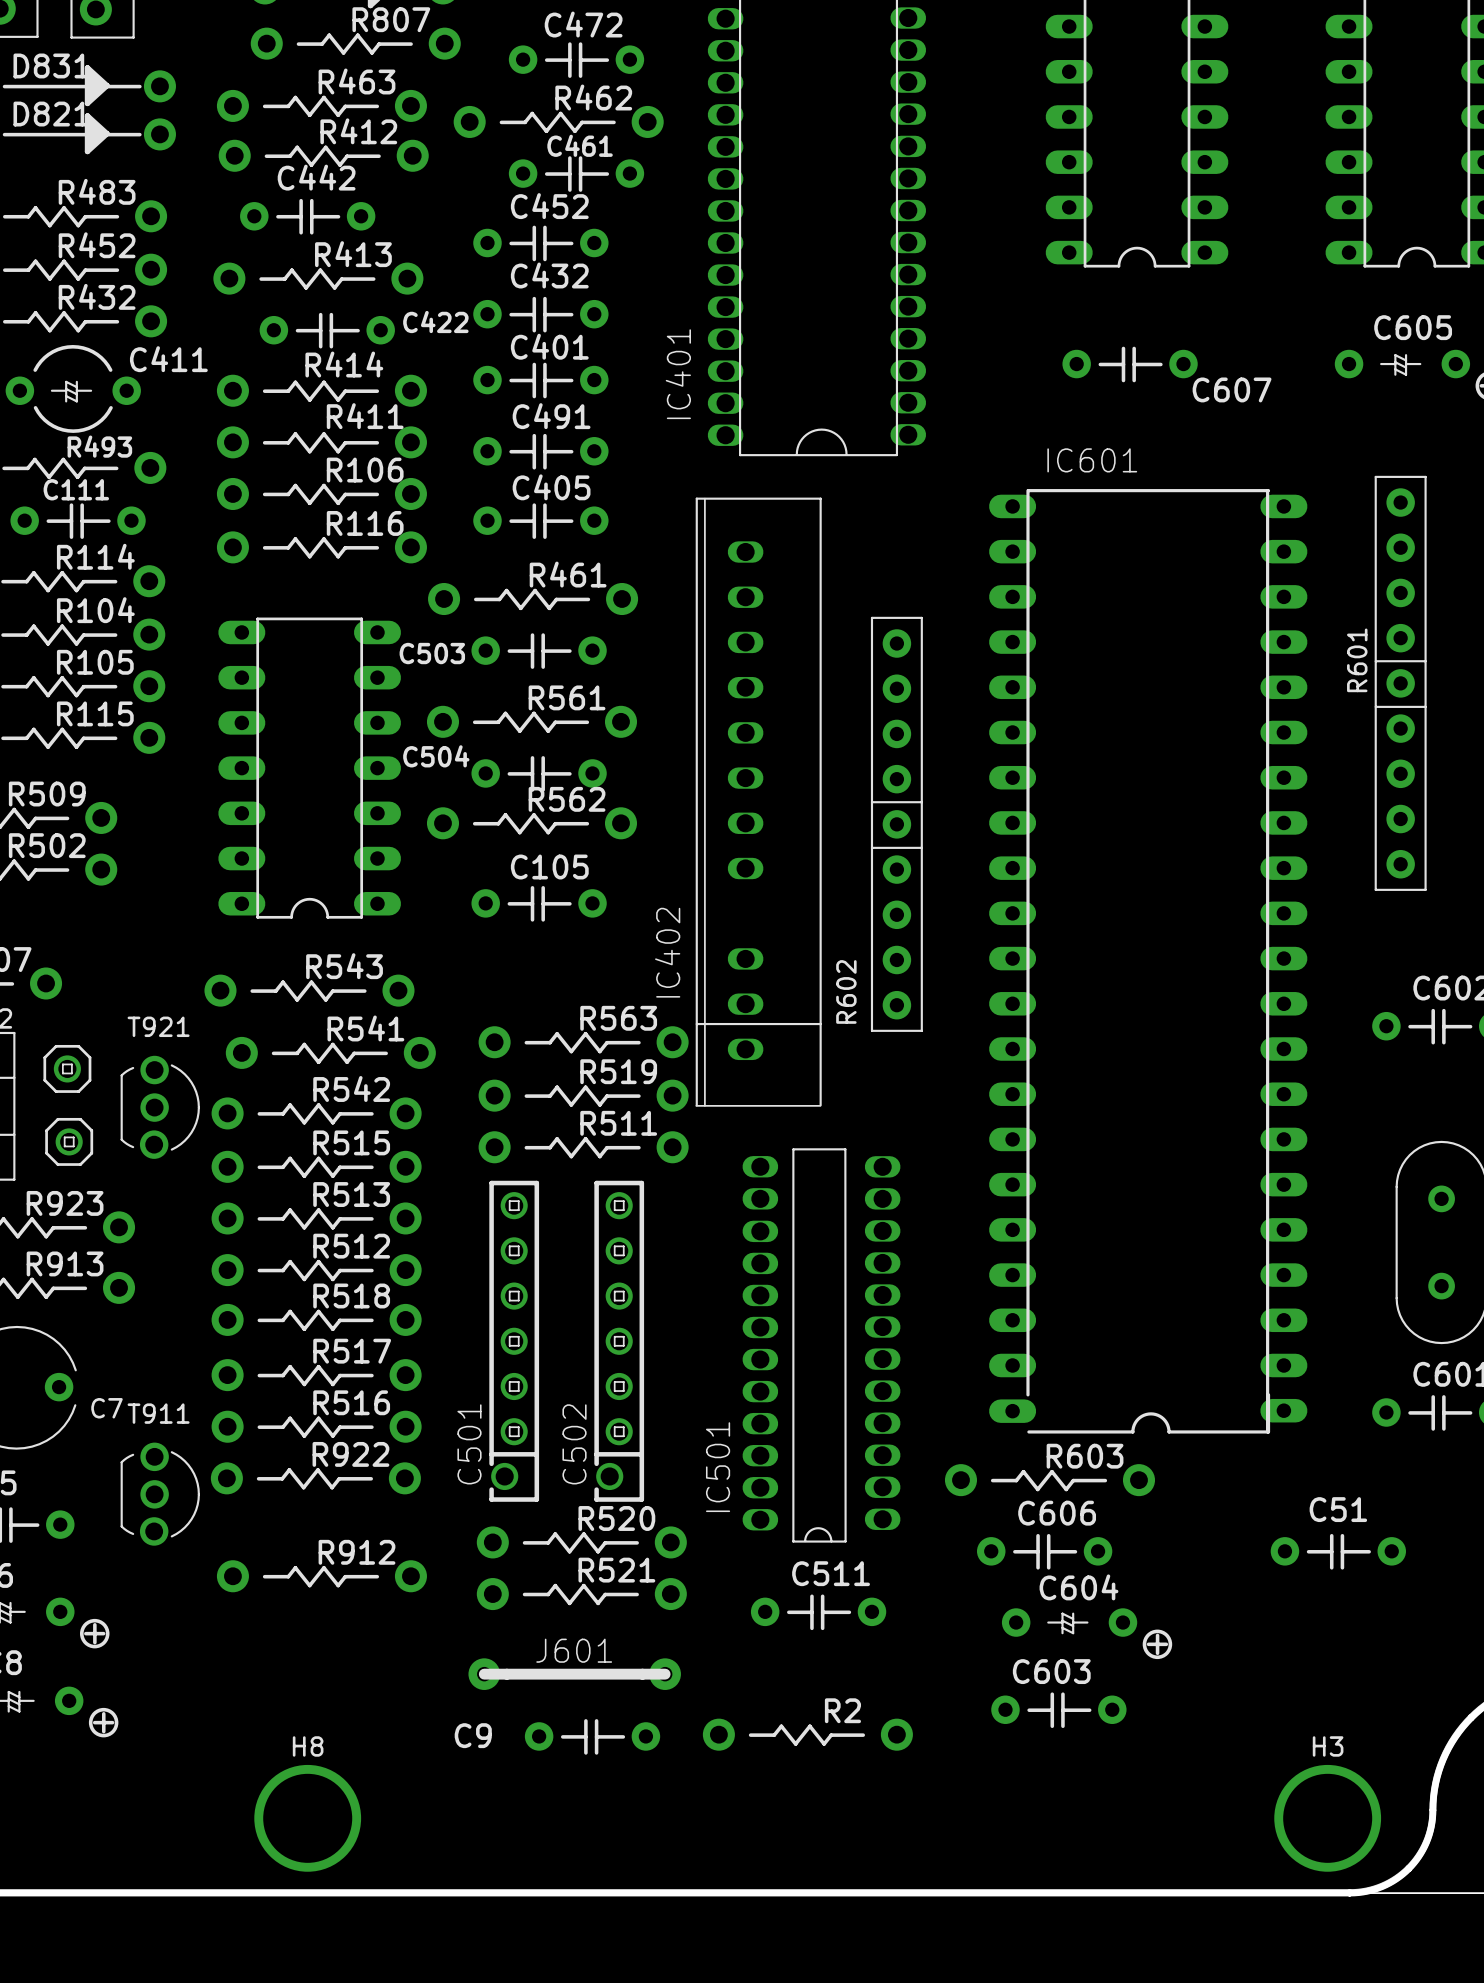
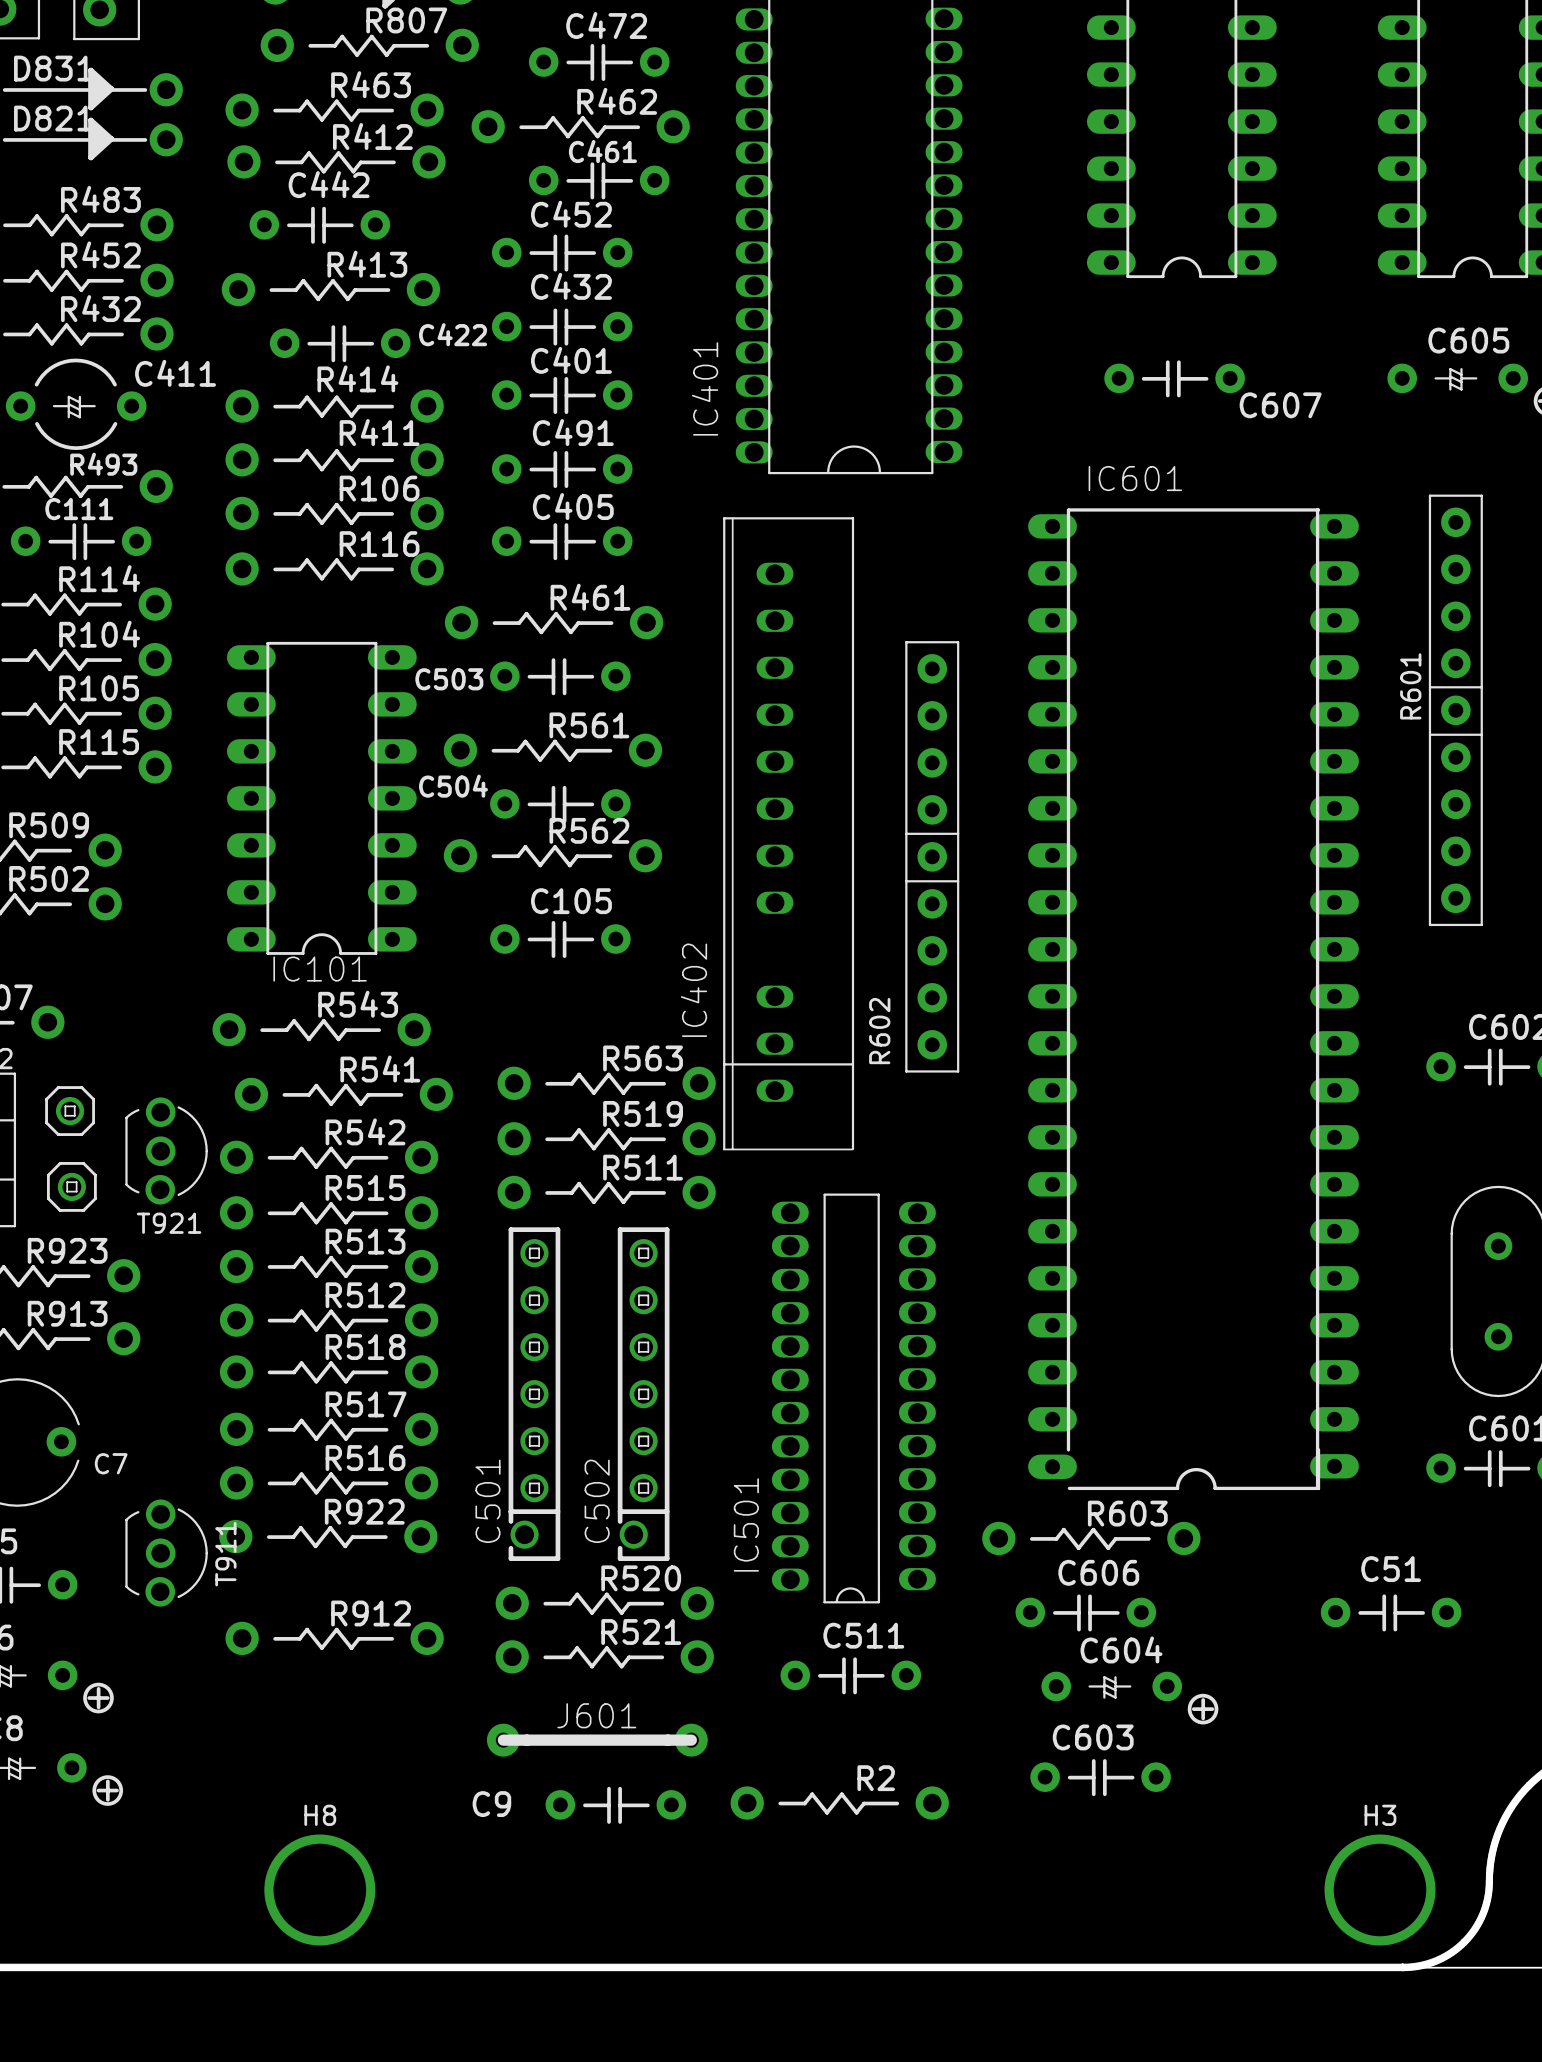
IC101 name: none -> IC101 (320, 969)
T921 name position: T921 (158, 1026) -> T921 (169, 1223)
T911 name rotation: 0° (158, 1413) -> 90° counterclockwise (225, 1554)
T911 name position: T911 (158, 1413) -> T911 (225, 1554)

